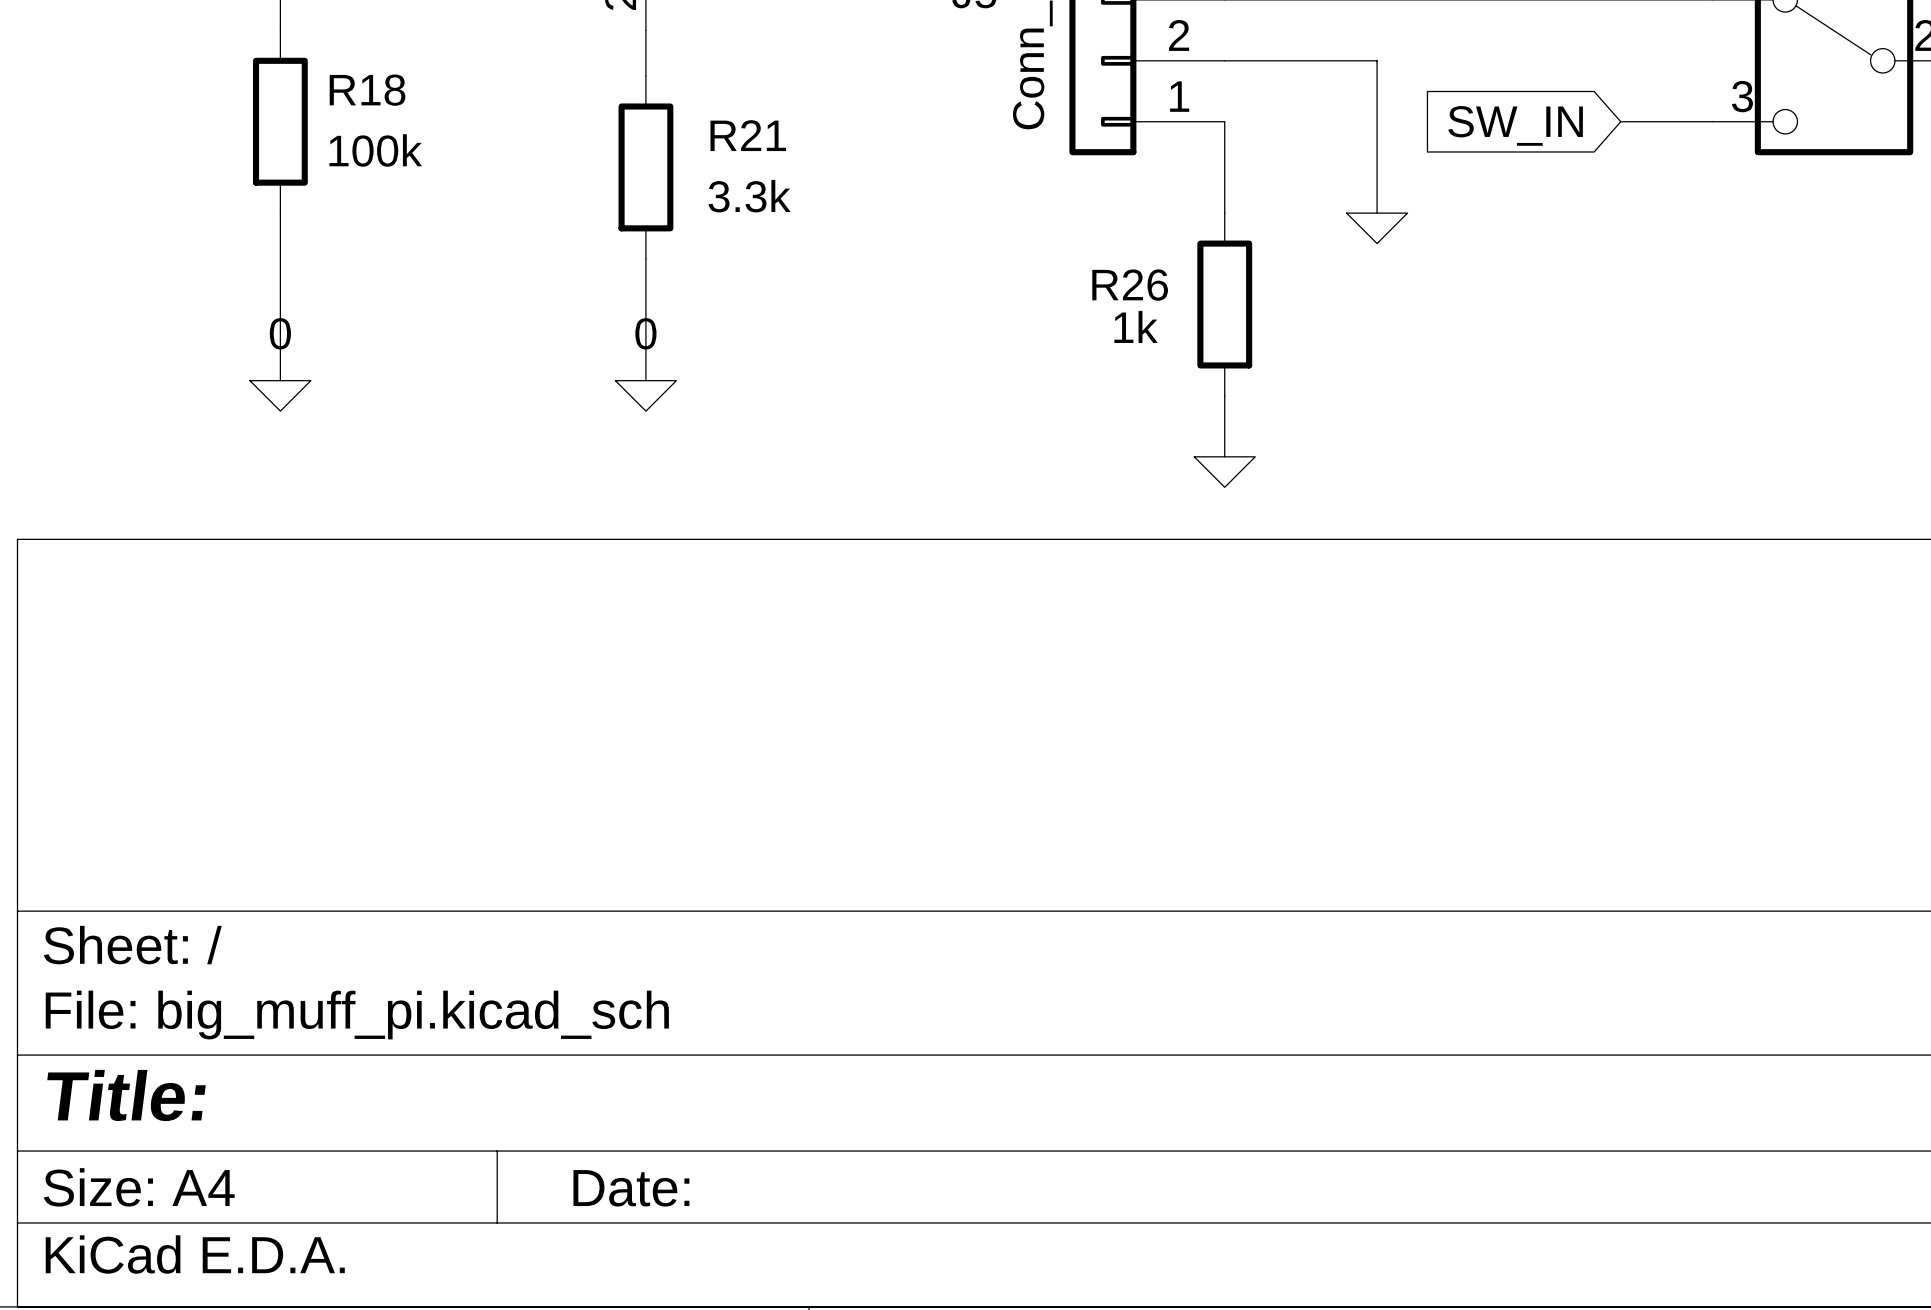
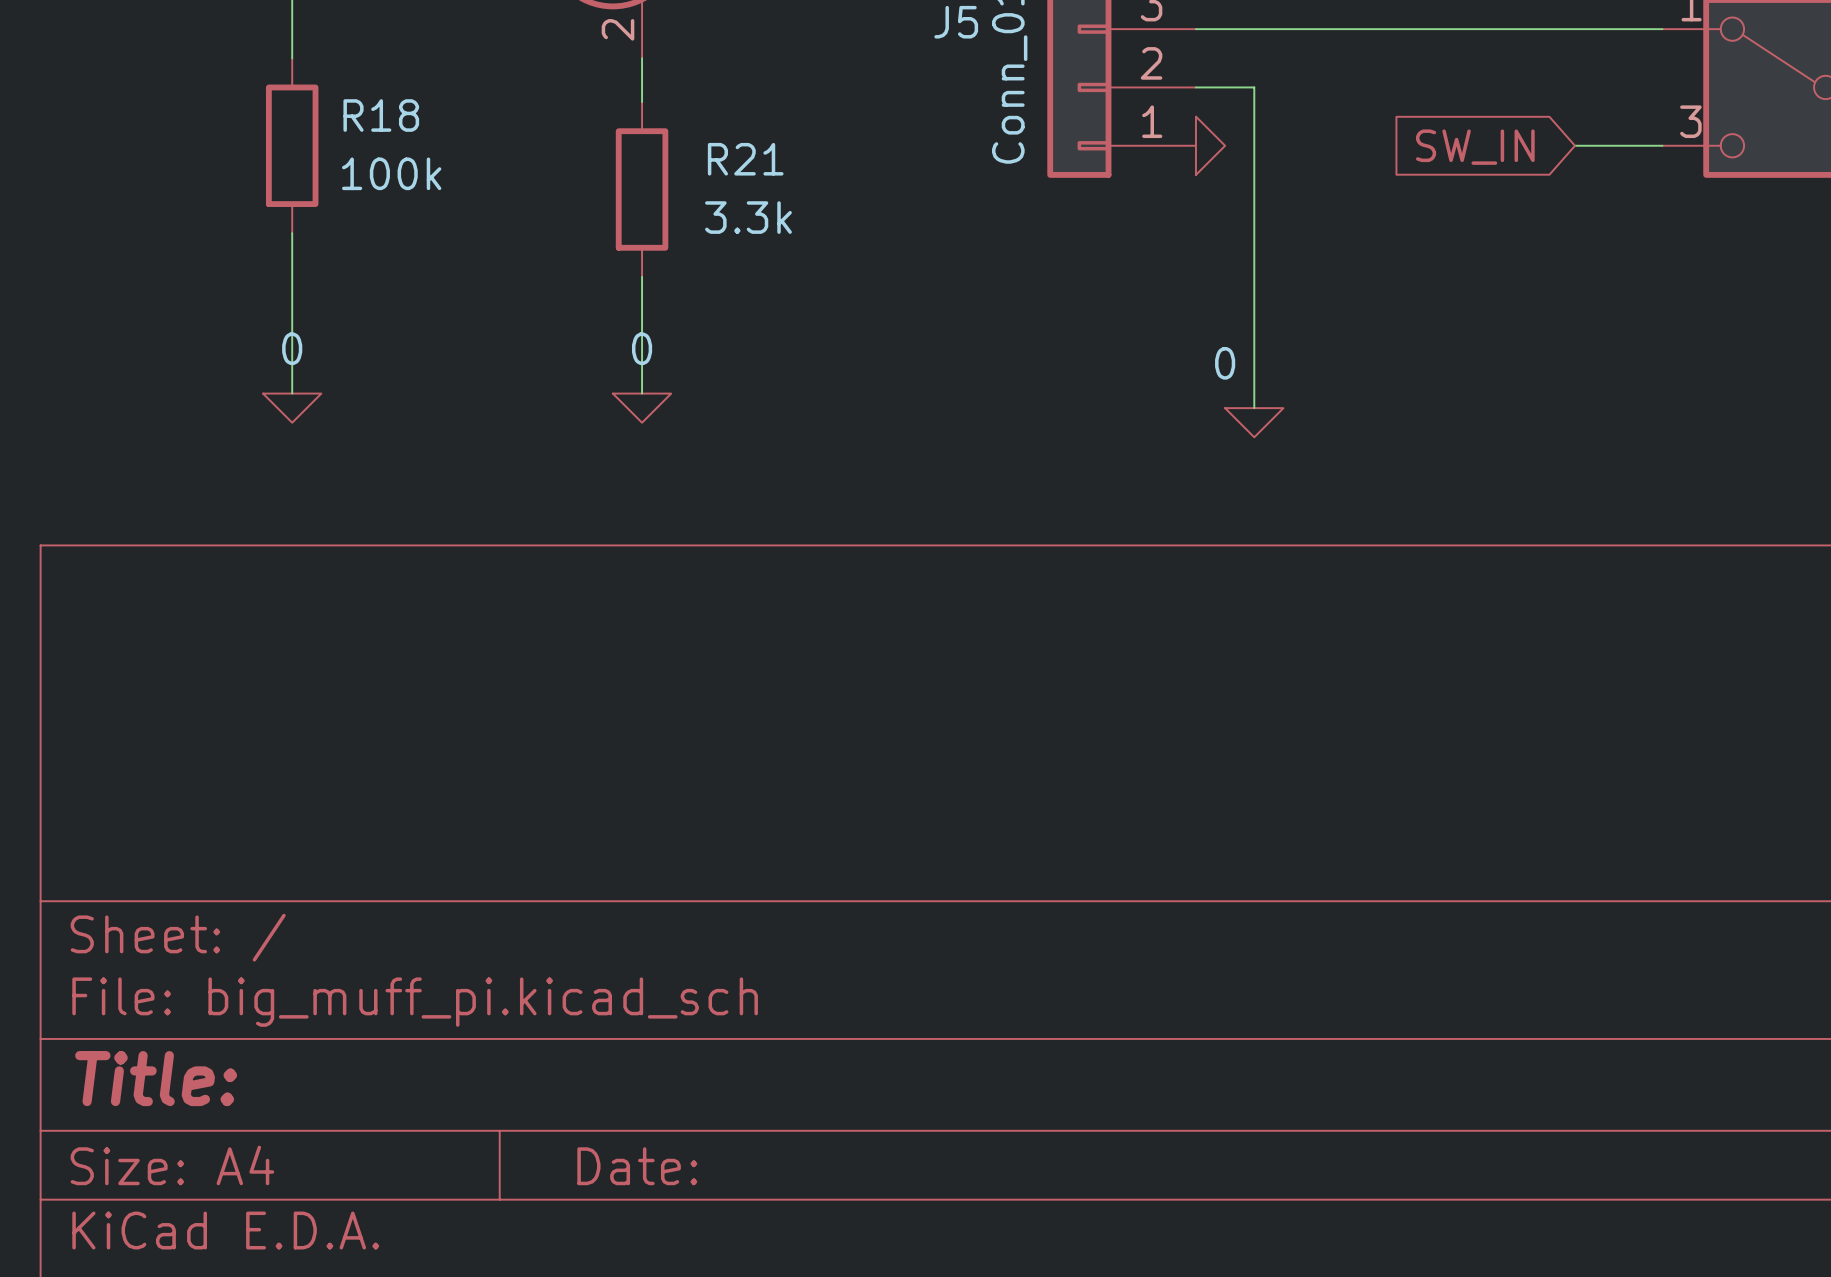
wire: (1285, 60) (1377, 60) (1377, 213) -> (1254, 87) (1254, 408)
wire: (1224, 121) (1224, 213) -> none
power symbol rotation: 0° (1377, 228) -> 90° counterclockwise (1210, 145)
power symbol position: (1377, 228) -> (1210, 145)
R26: 1k (1224, 304) -> none
wire: (1224, 395) (1224, 456) -> none
power symbol: none -> 0 (1254, 422)
power symbol: (1224, 472) -> none

